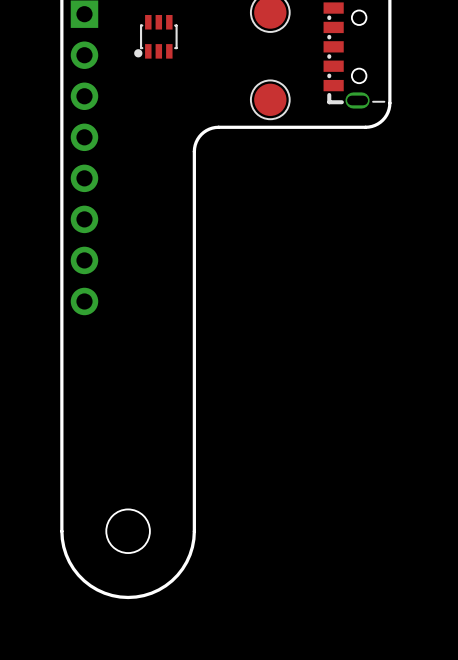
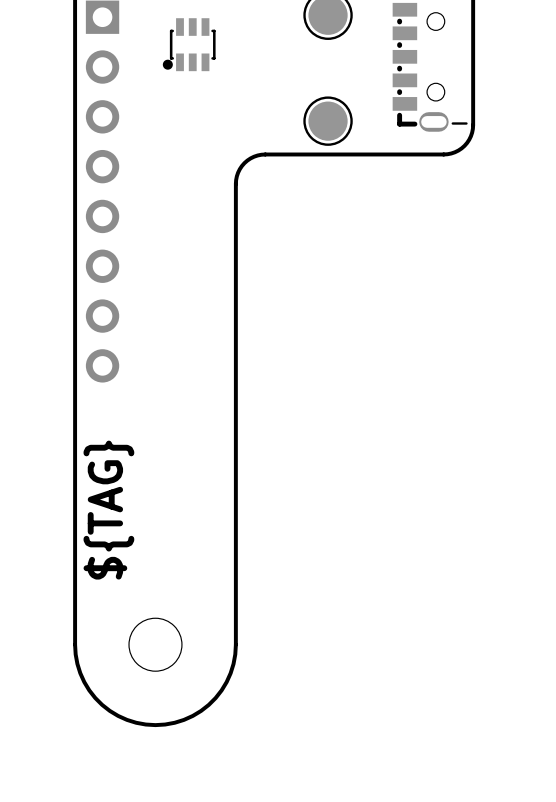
text: none -> ${TAG} (108, 510)

